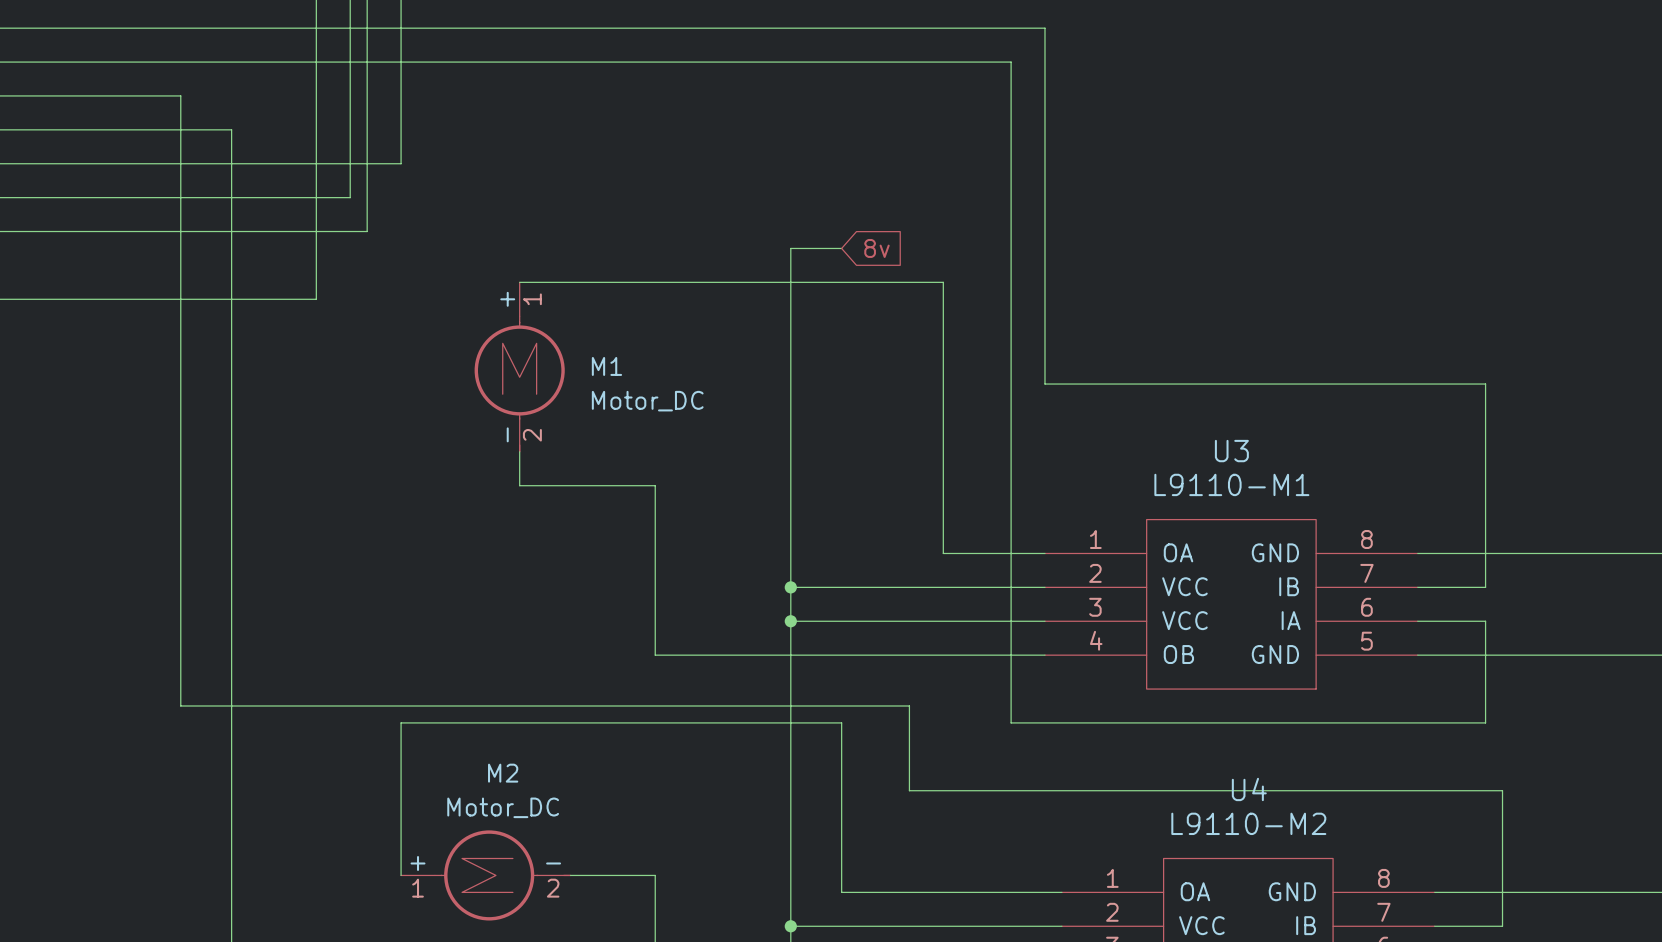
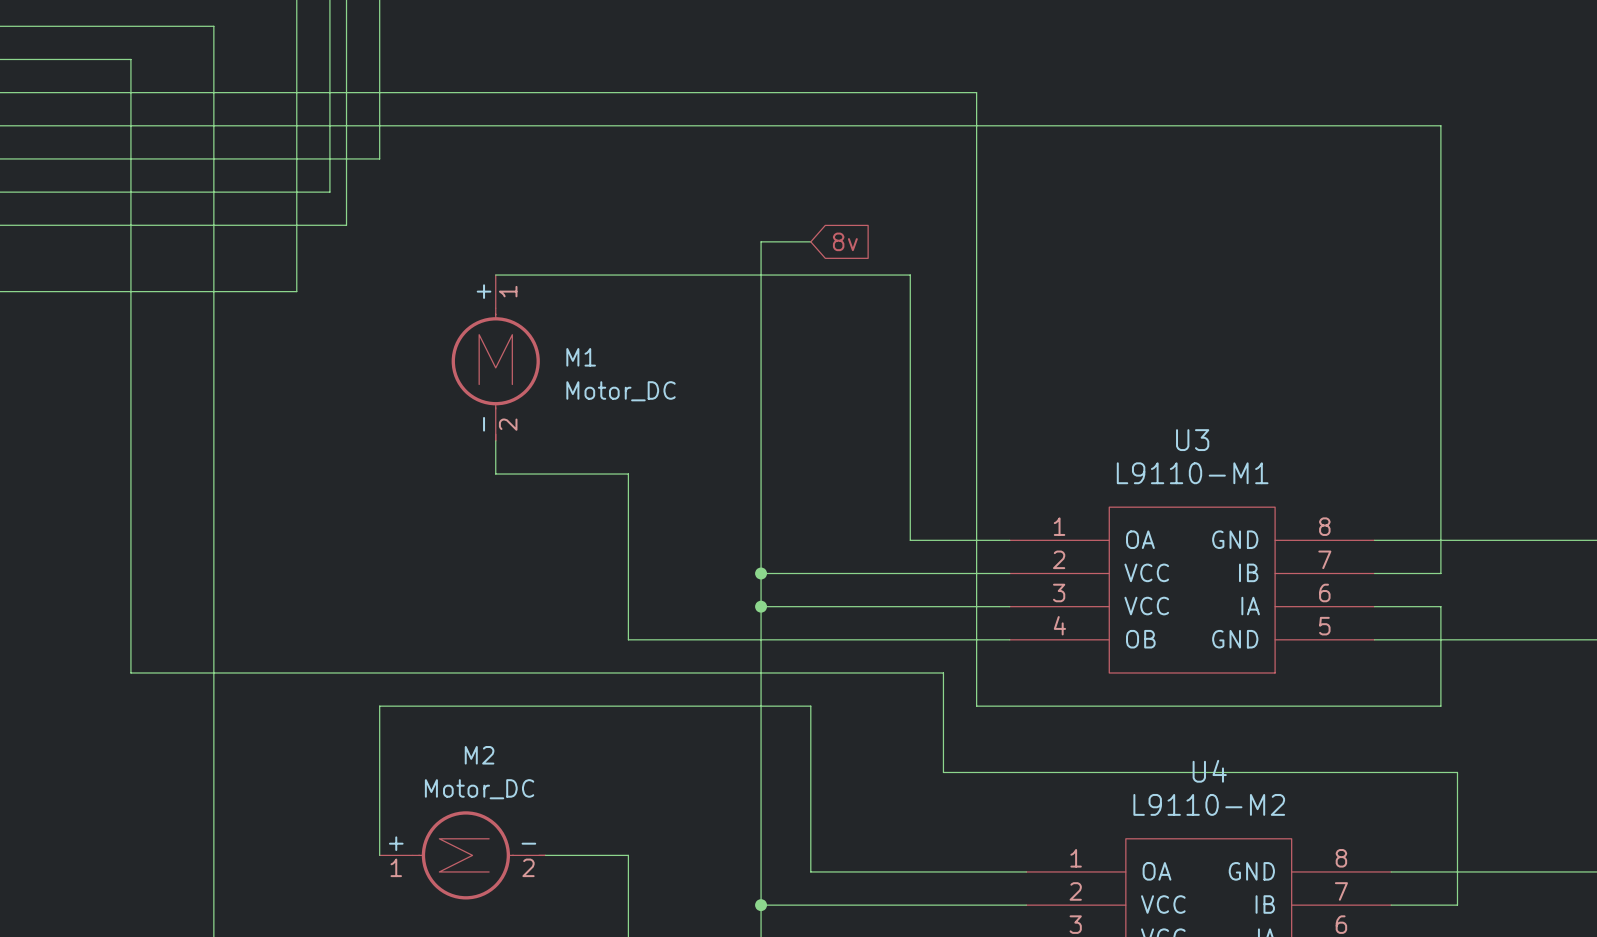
wire: (231, 28) (1044, 28) (1044, 384) (1485, 384) -> (213, 26) (213, 125) (1440, 125) (1440, 374)
wire: (146, 62) (1011, 62) (1011, 95) -> (164, 92) (976, 92)
wire: (180, 95) (180, 705) (909, 705) (909, 790) (977, 790) -> (130, 59) (130, 672) (943, 672) (943, 772)

